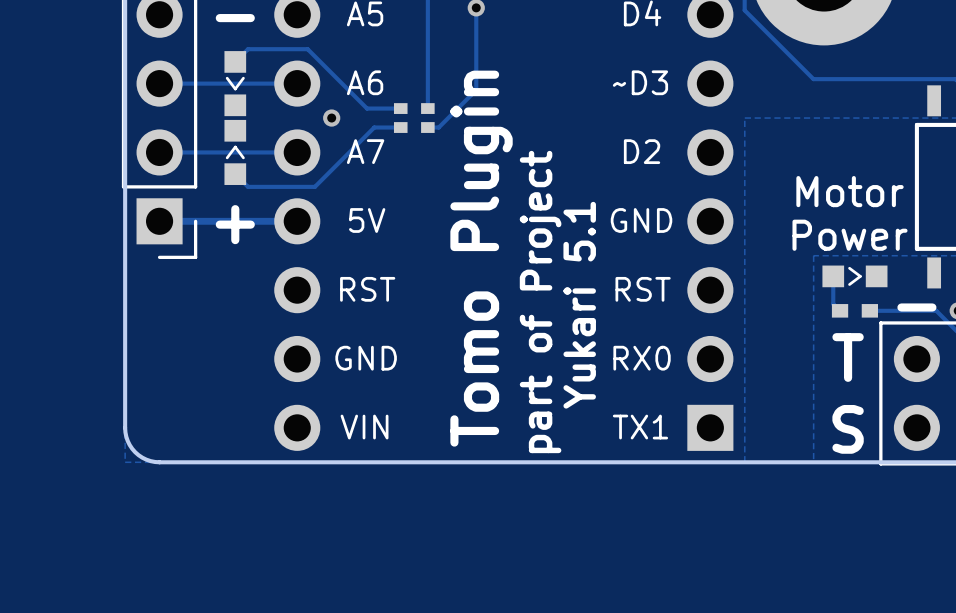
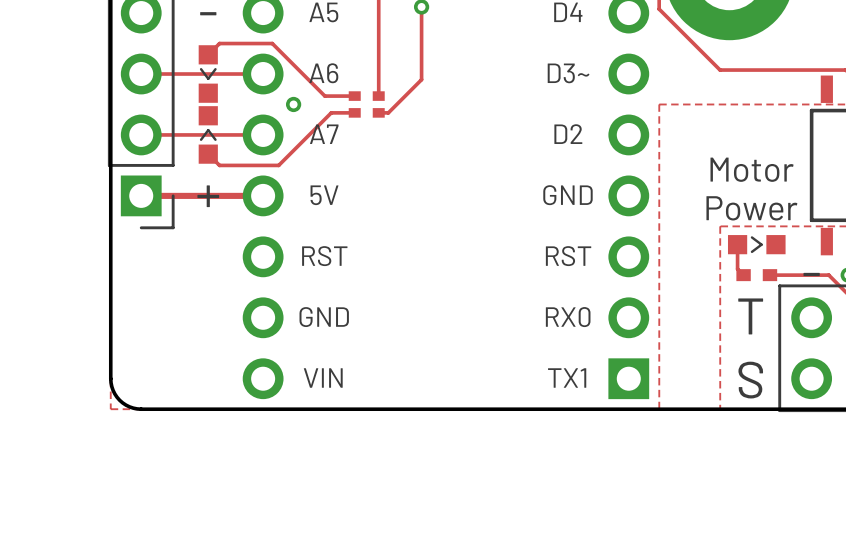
part text: ~D3 (640, 82) -> D3~ (568, 73)
text: Tomo Plugin (481, 258) -> none
text: part of Project (540, 301) -> none
text: Yukari 5.1 (579, 305) -> none

